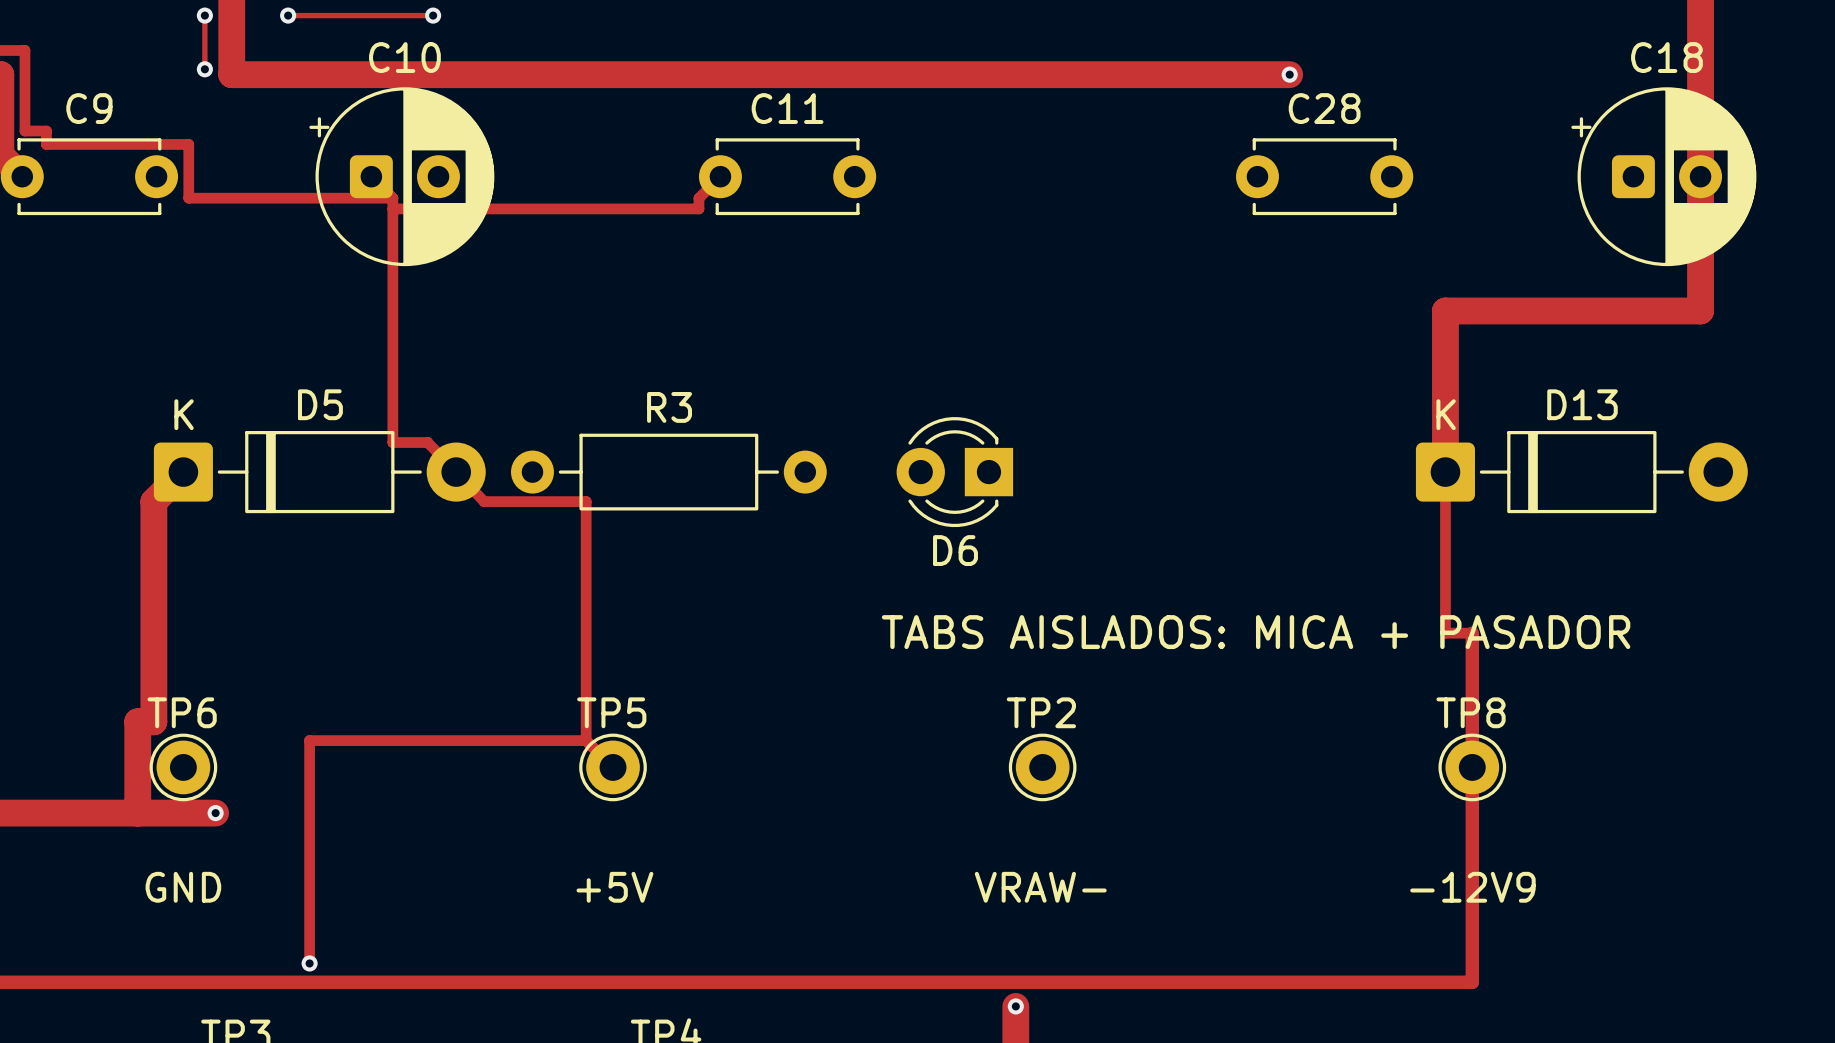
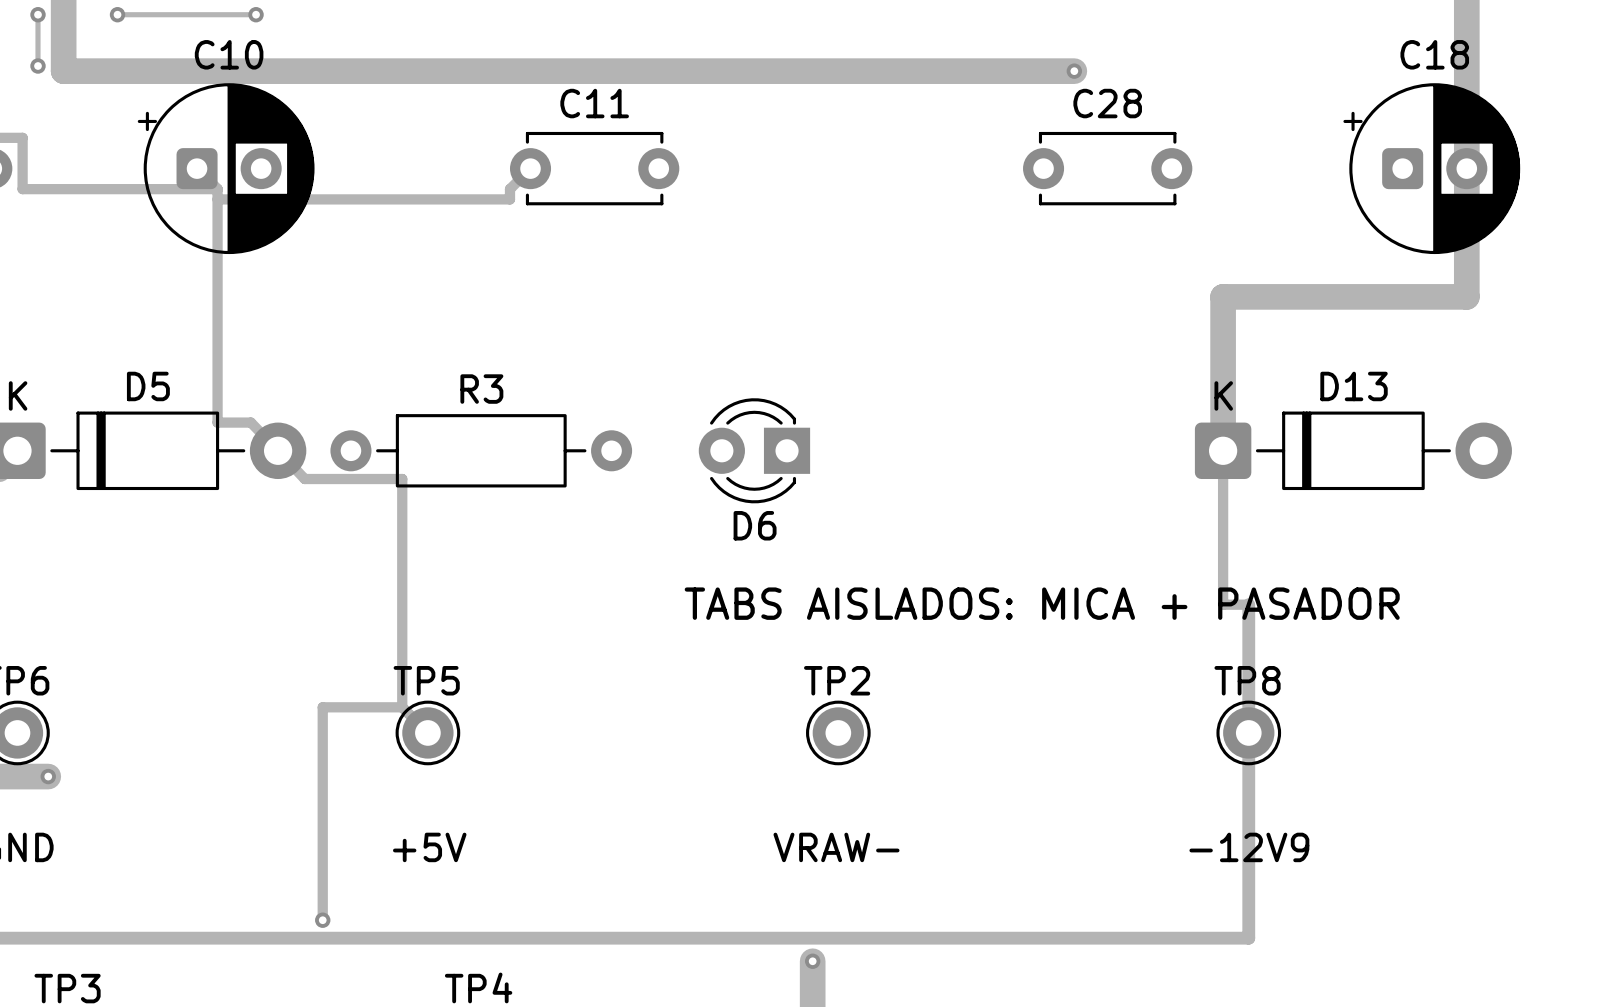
track: (502, 740) (309, 740) (309, 963) -> (322, 707) (322, 920)
via: (309, 963) -> none
via: none -> (322, 920)

